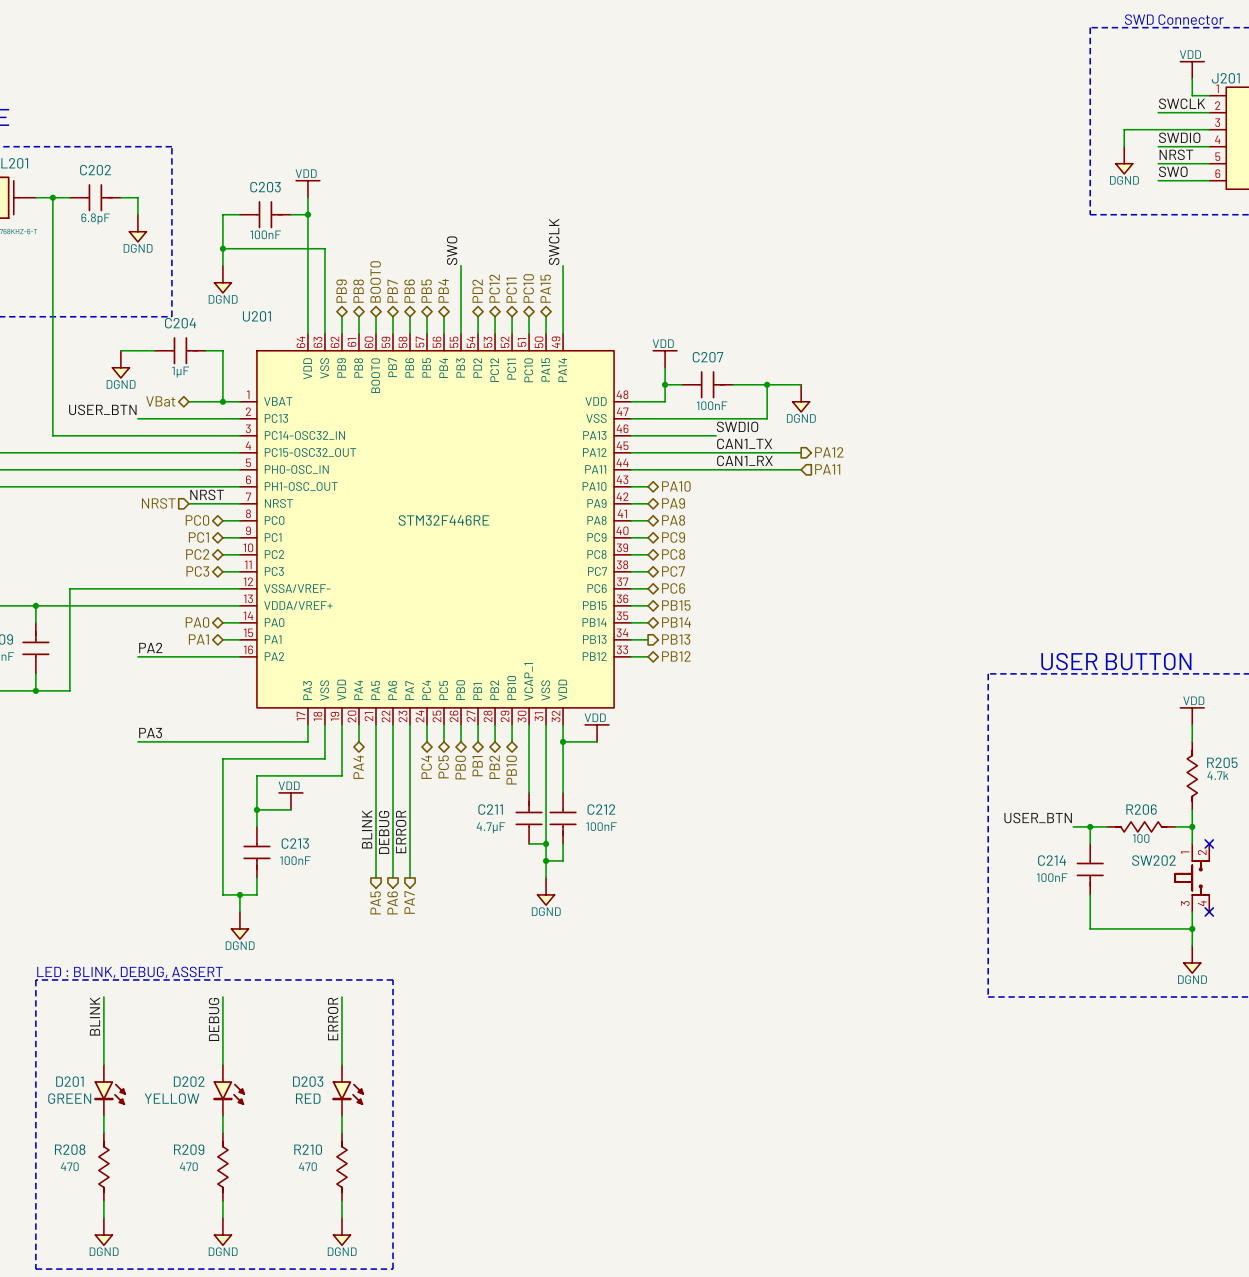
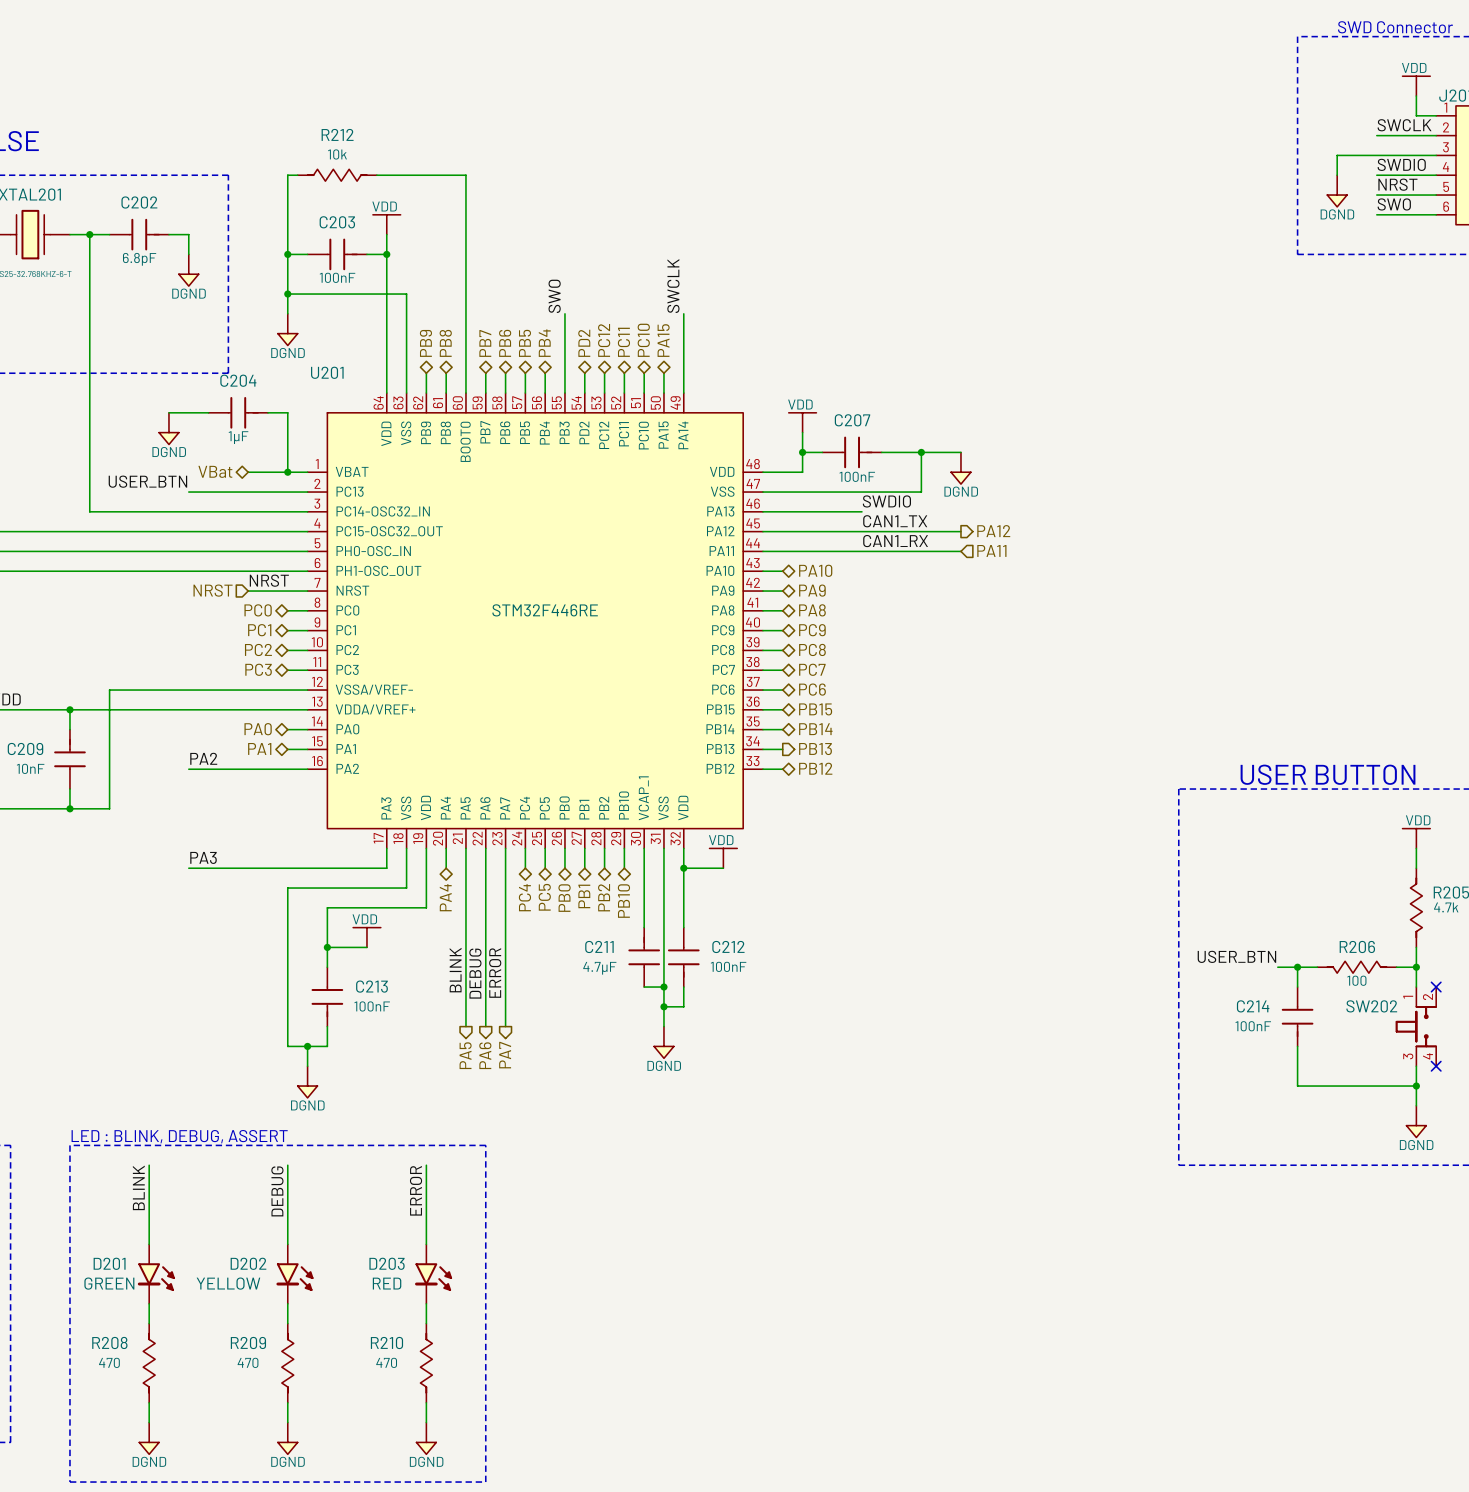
wire: none -> (297, 175) (287, 175) (287, 254)
R212: none -> (337, 175)
wire: none -> (376, 175) (465, 175) (465, 373)
junction: none -> (287, 254)
hierarchical label: BOOT0 (375, 281) -> none

